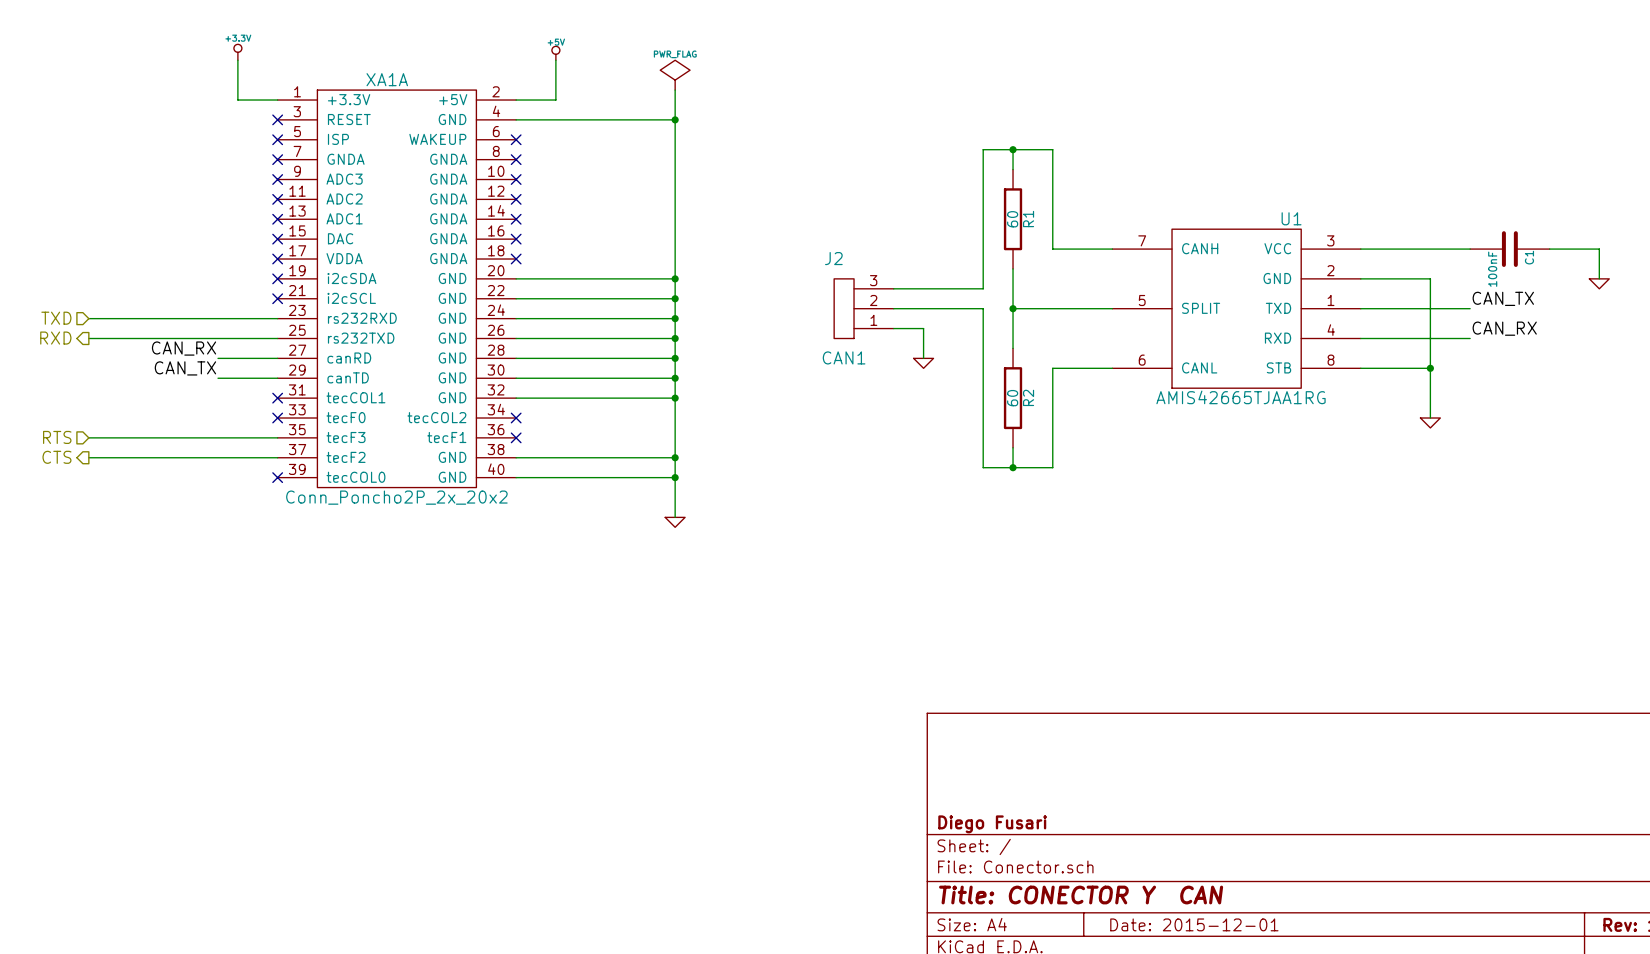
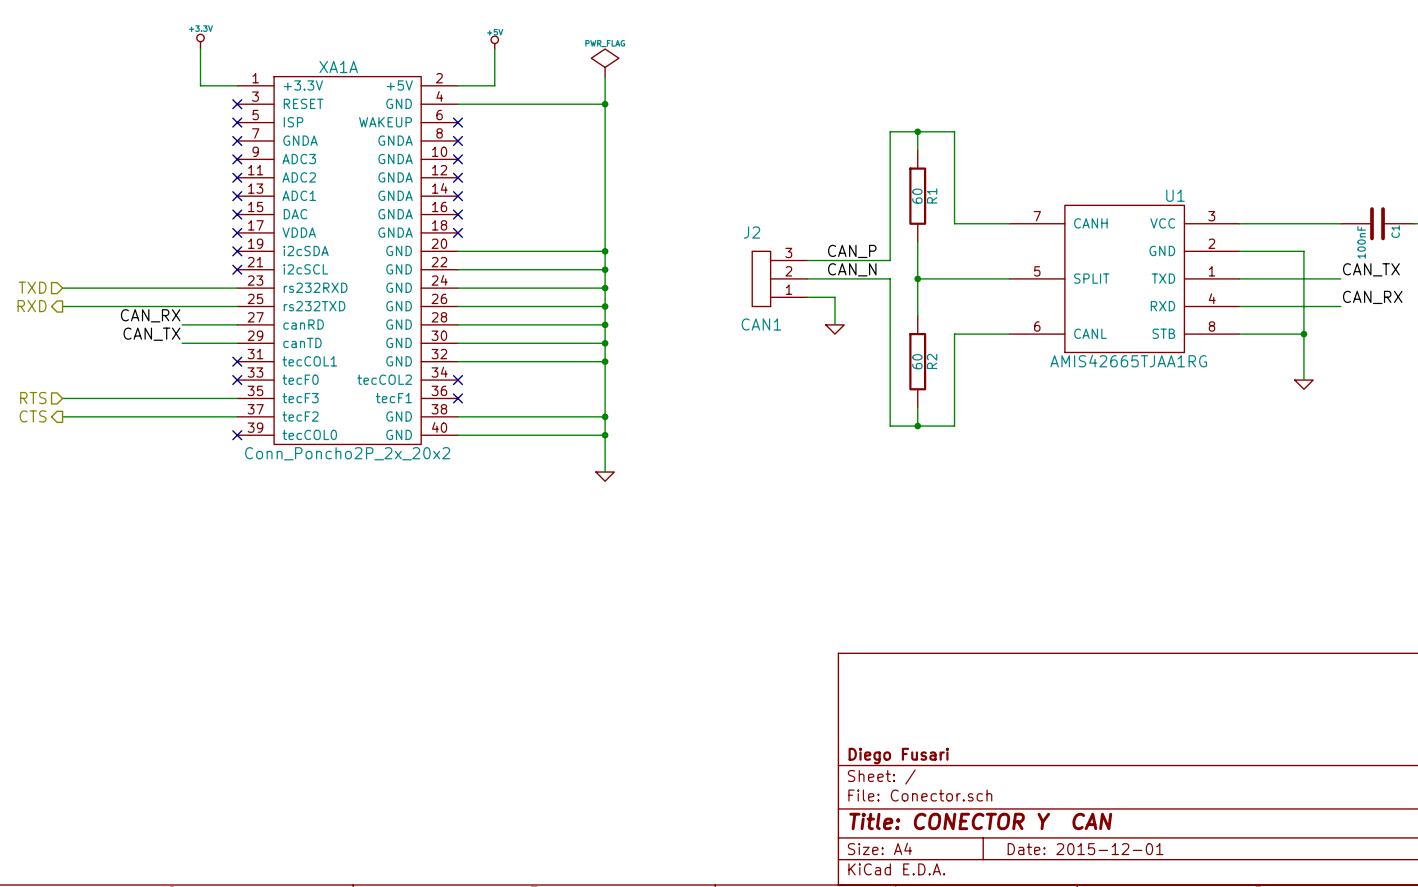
label: none -> CAN_P (852, 251)
label: none -> CAN_N (852, 269)

